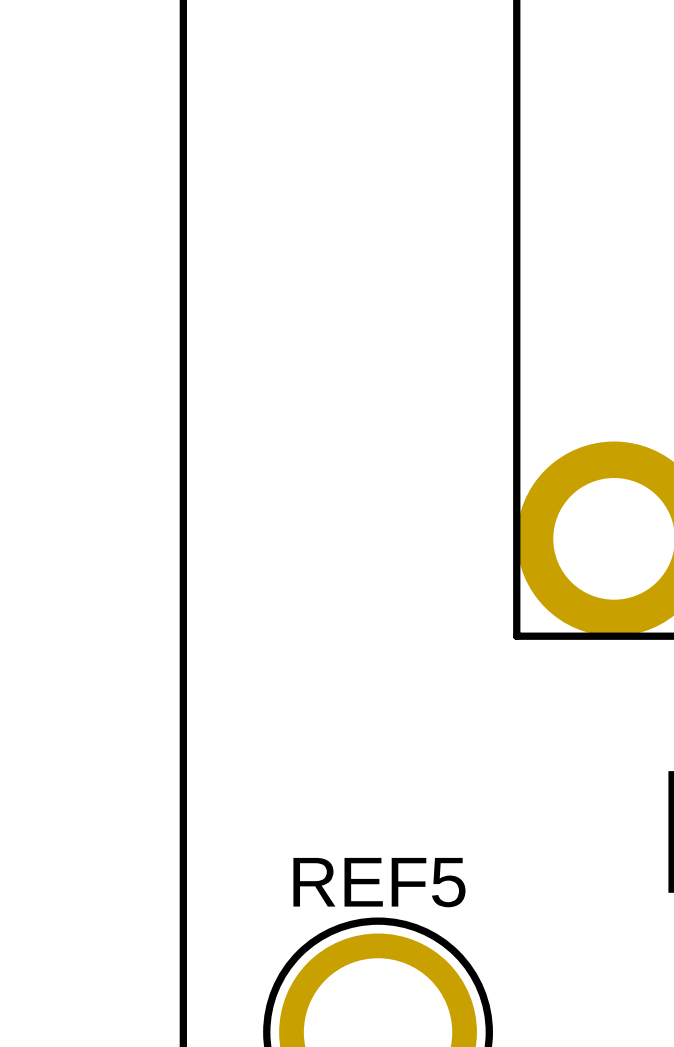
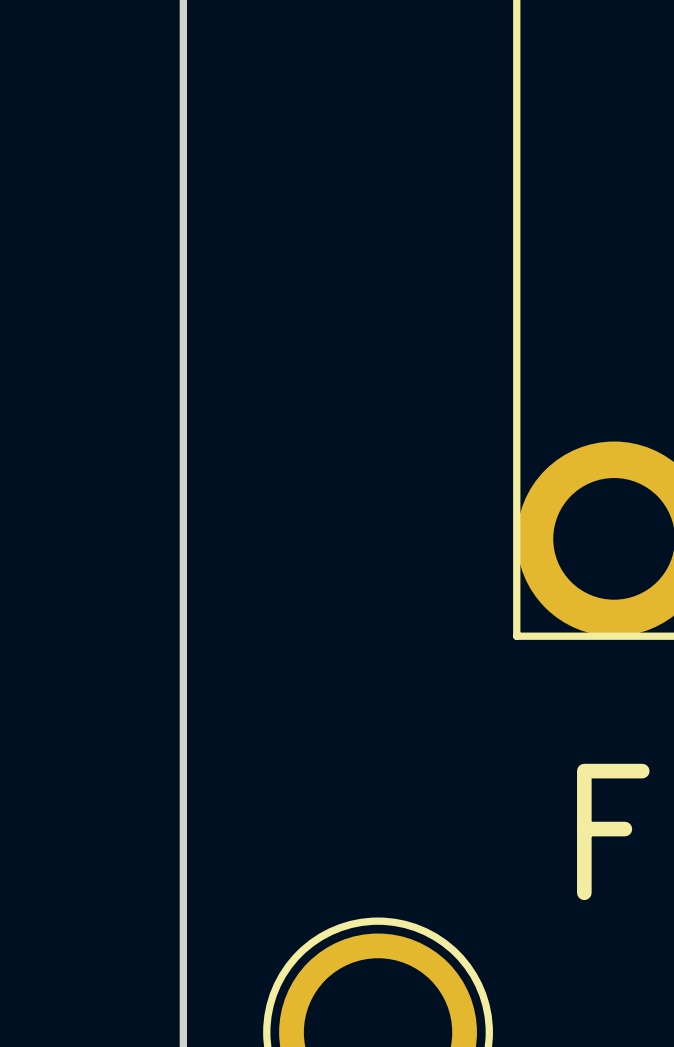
REF5 name: REF5 (379, 882) -> none

